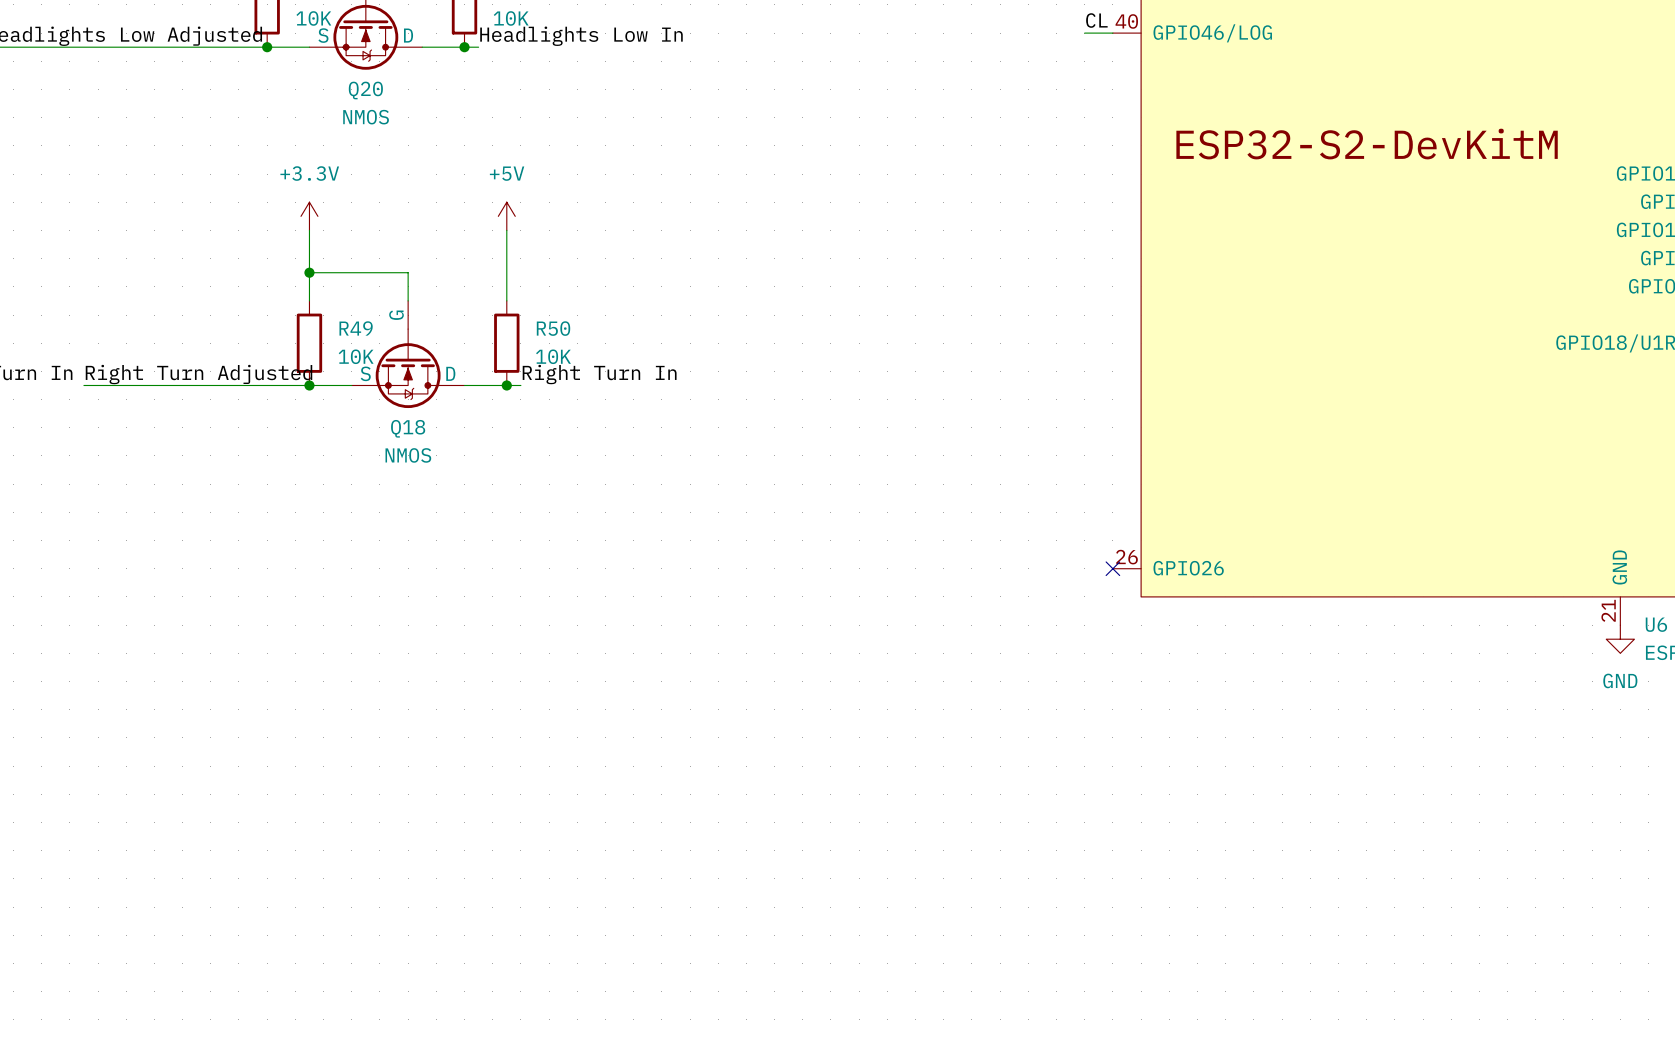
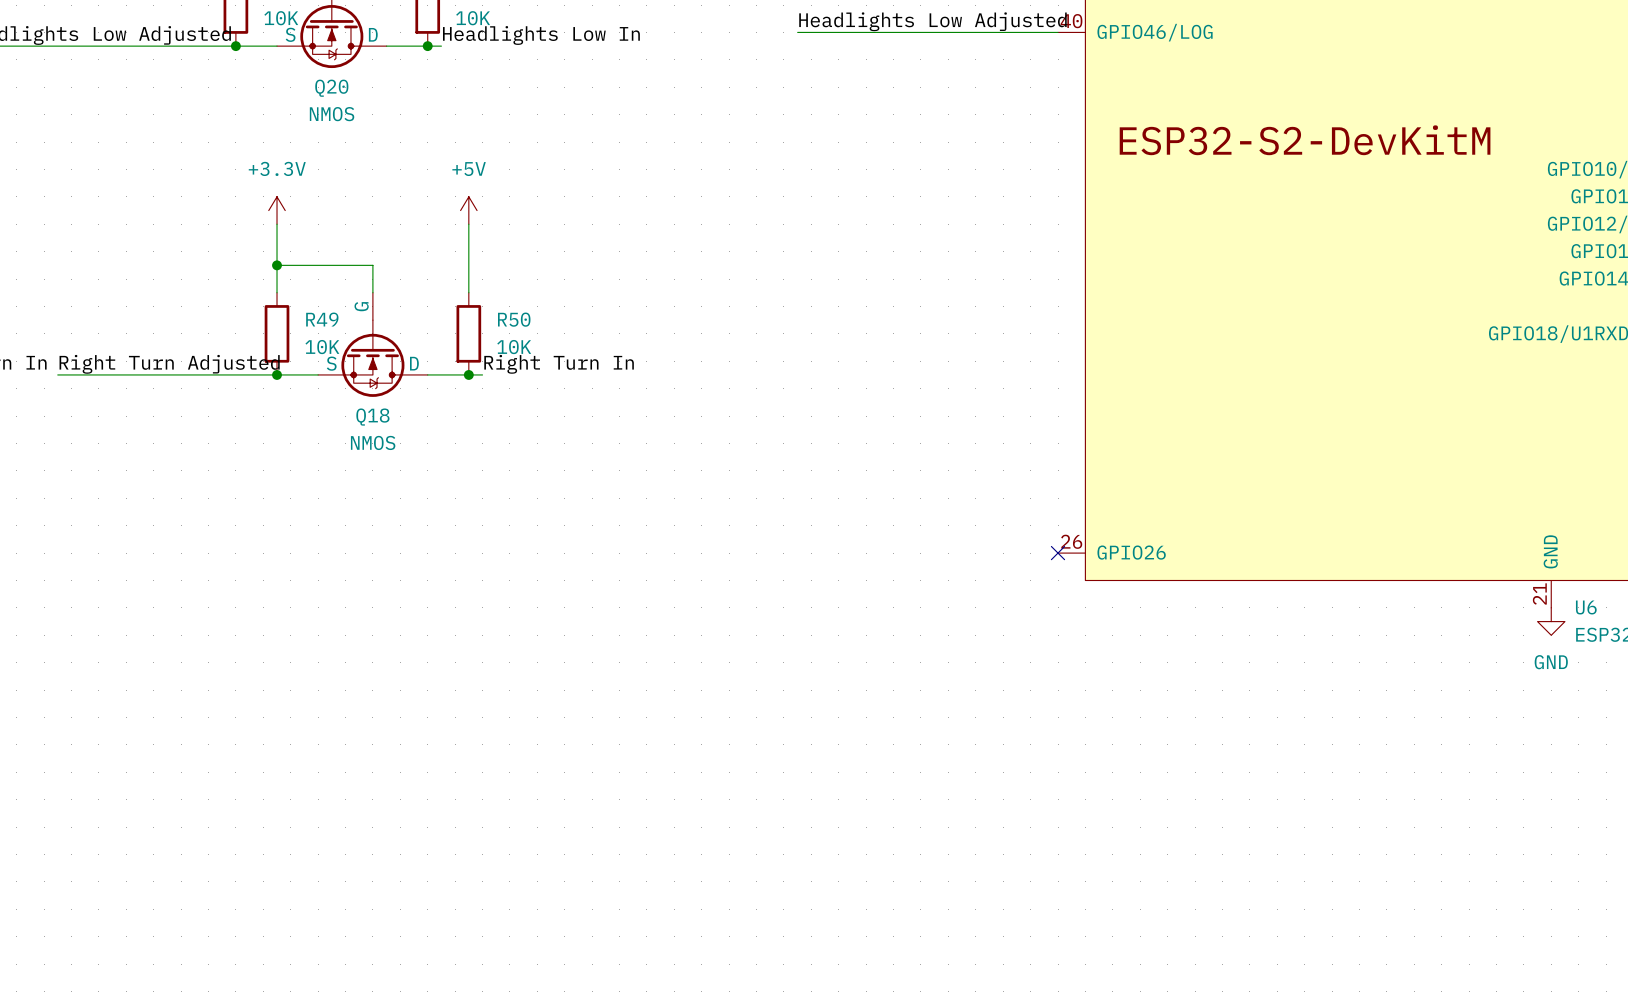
label: CL (1096, 20) -> none
label: none -> Headlights Low Adjusted (932, 21)
wire: none -> (797, 32) (1030, 32)

